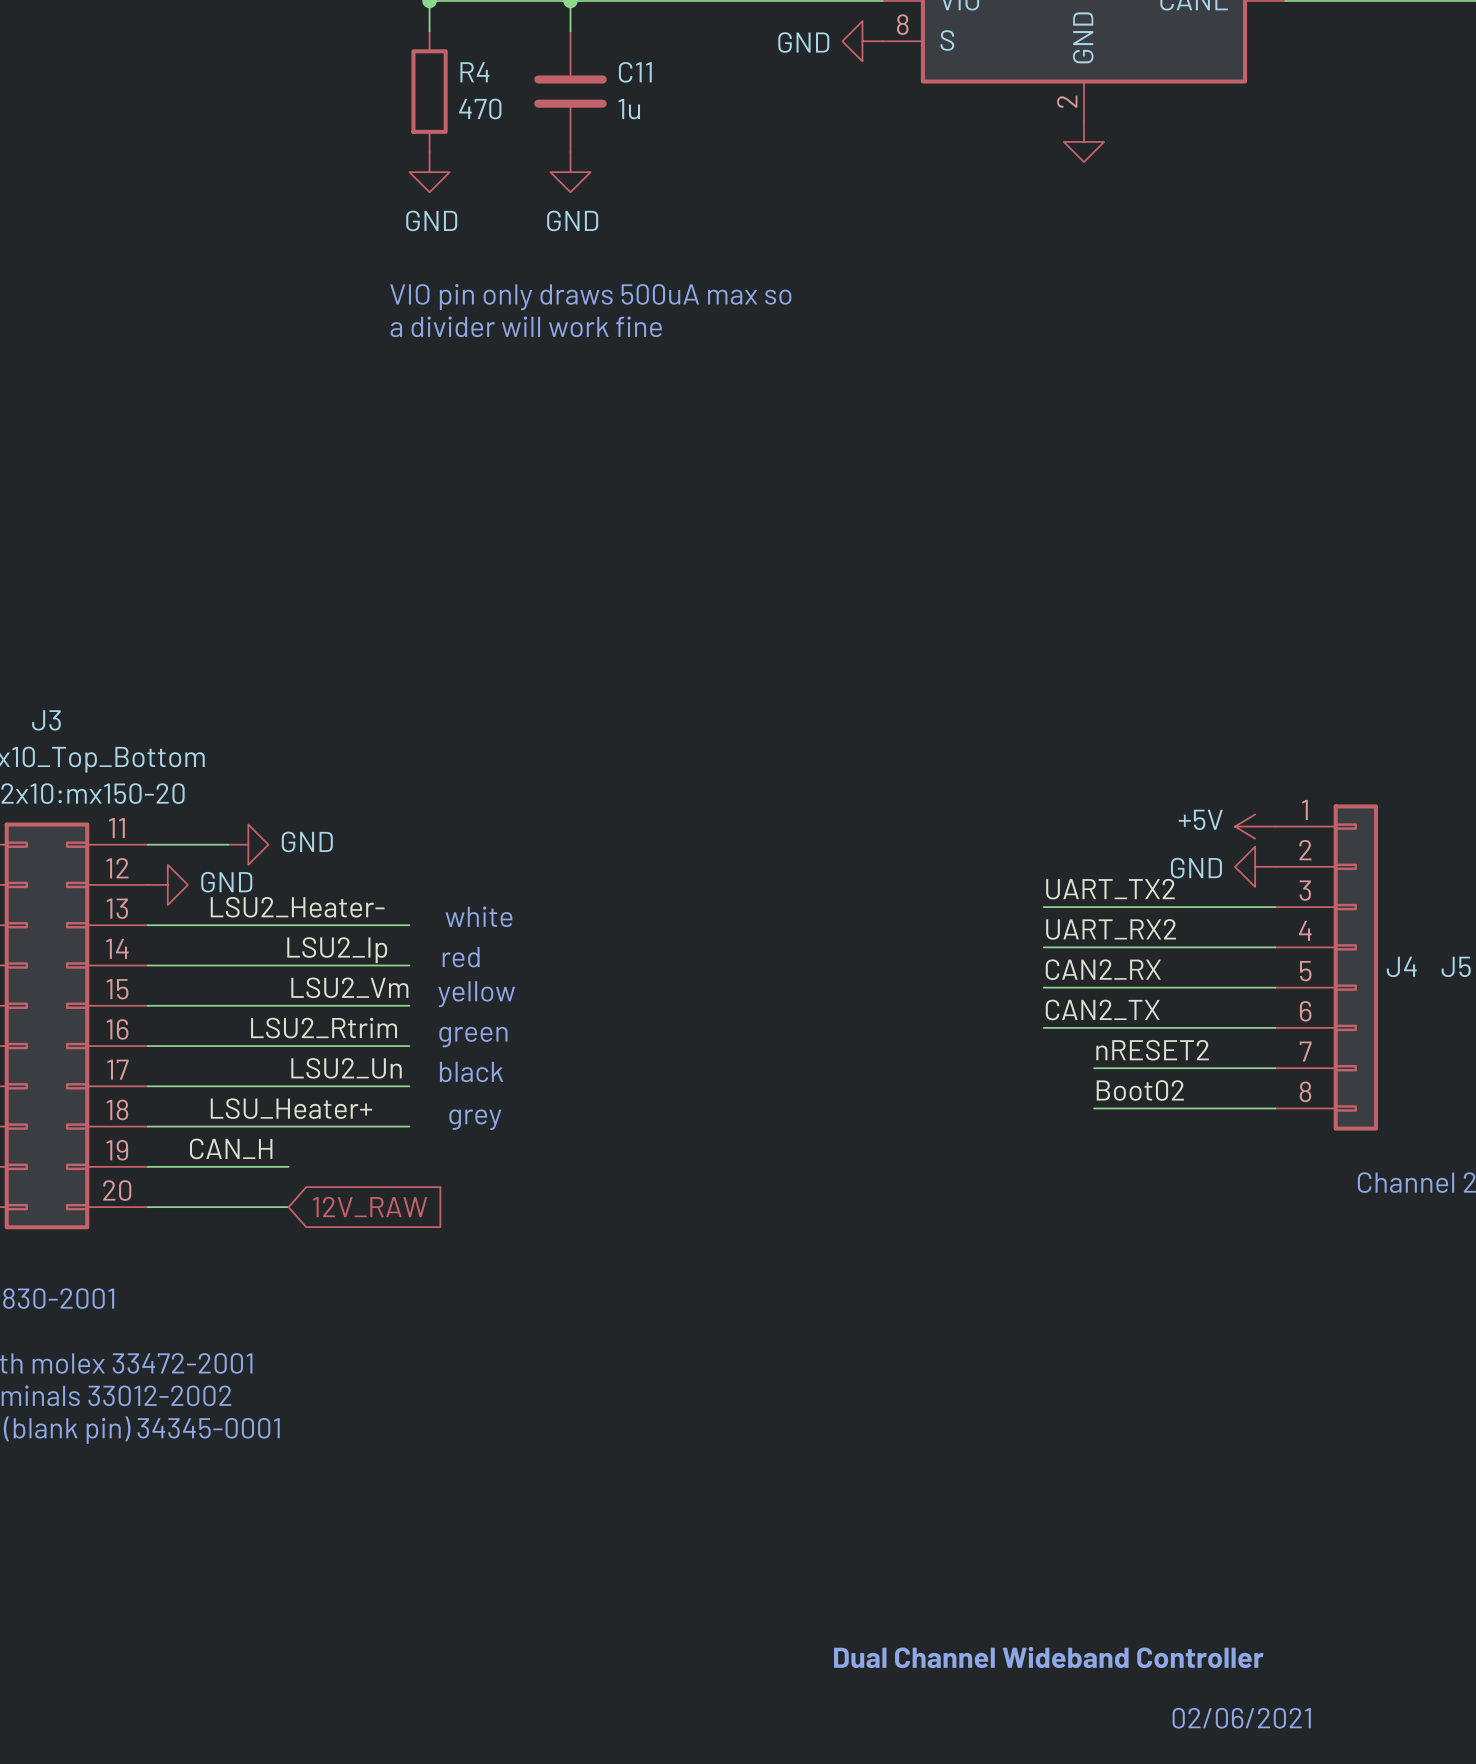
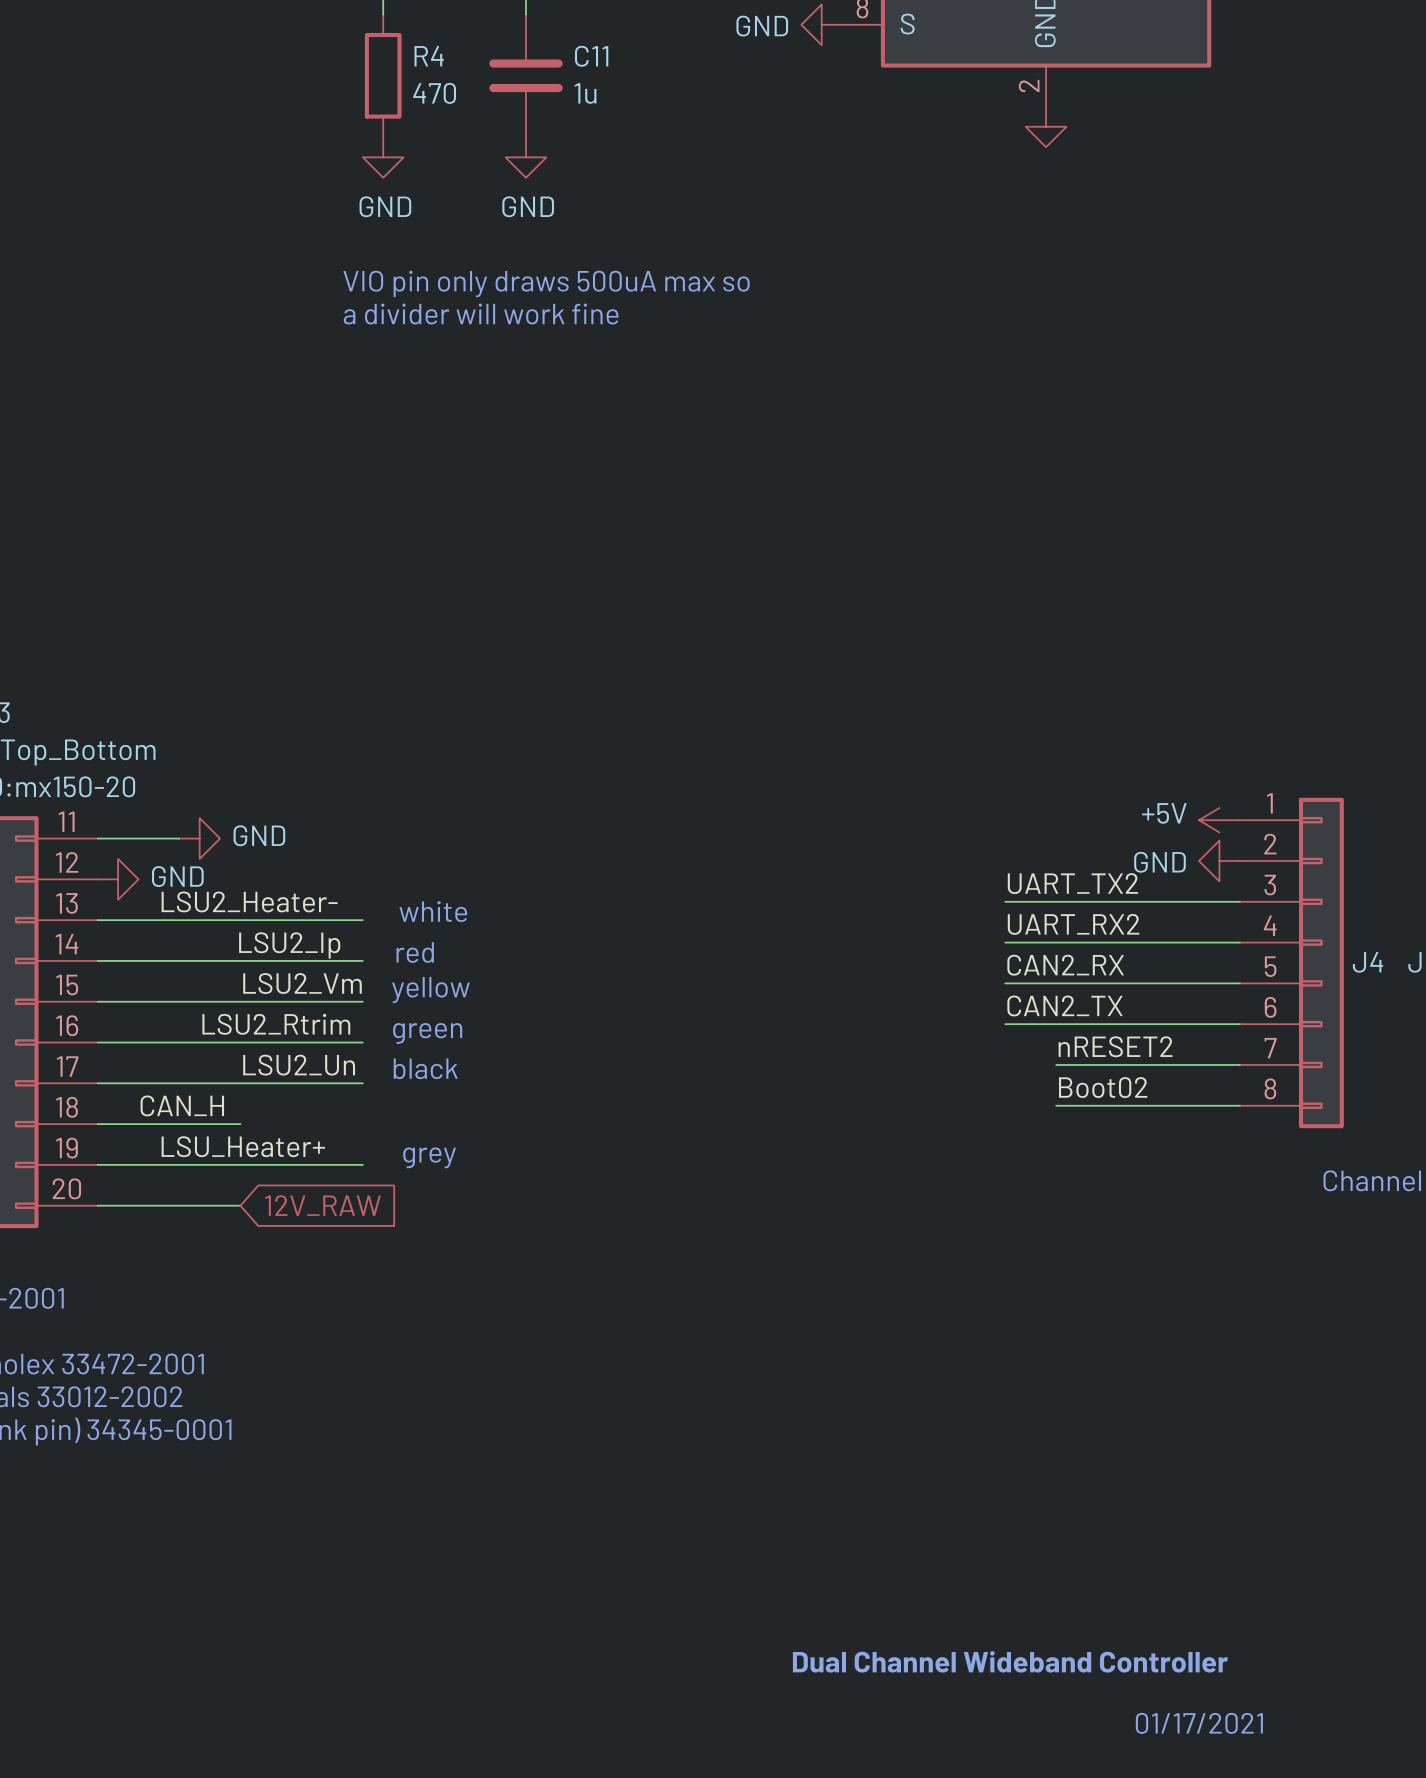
label position: LSU_Heater+ (291, 1108) -> LSU_Heater+ (243, 1146)
text position: grey (475, 1119) -> grey (429, 1157)
wire: (288, 1126) (409, 1126) -> (240, 1164) (362, 1164)
label position: CAN_H (231, 1148) -> CAN_H (182, 1105)
text: 02/06/2021 (1241, 1718) -> 01/17/2021 (1199, 1723)

